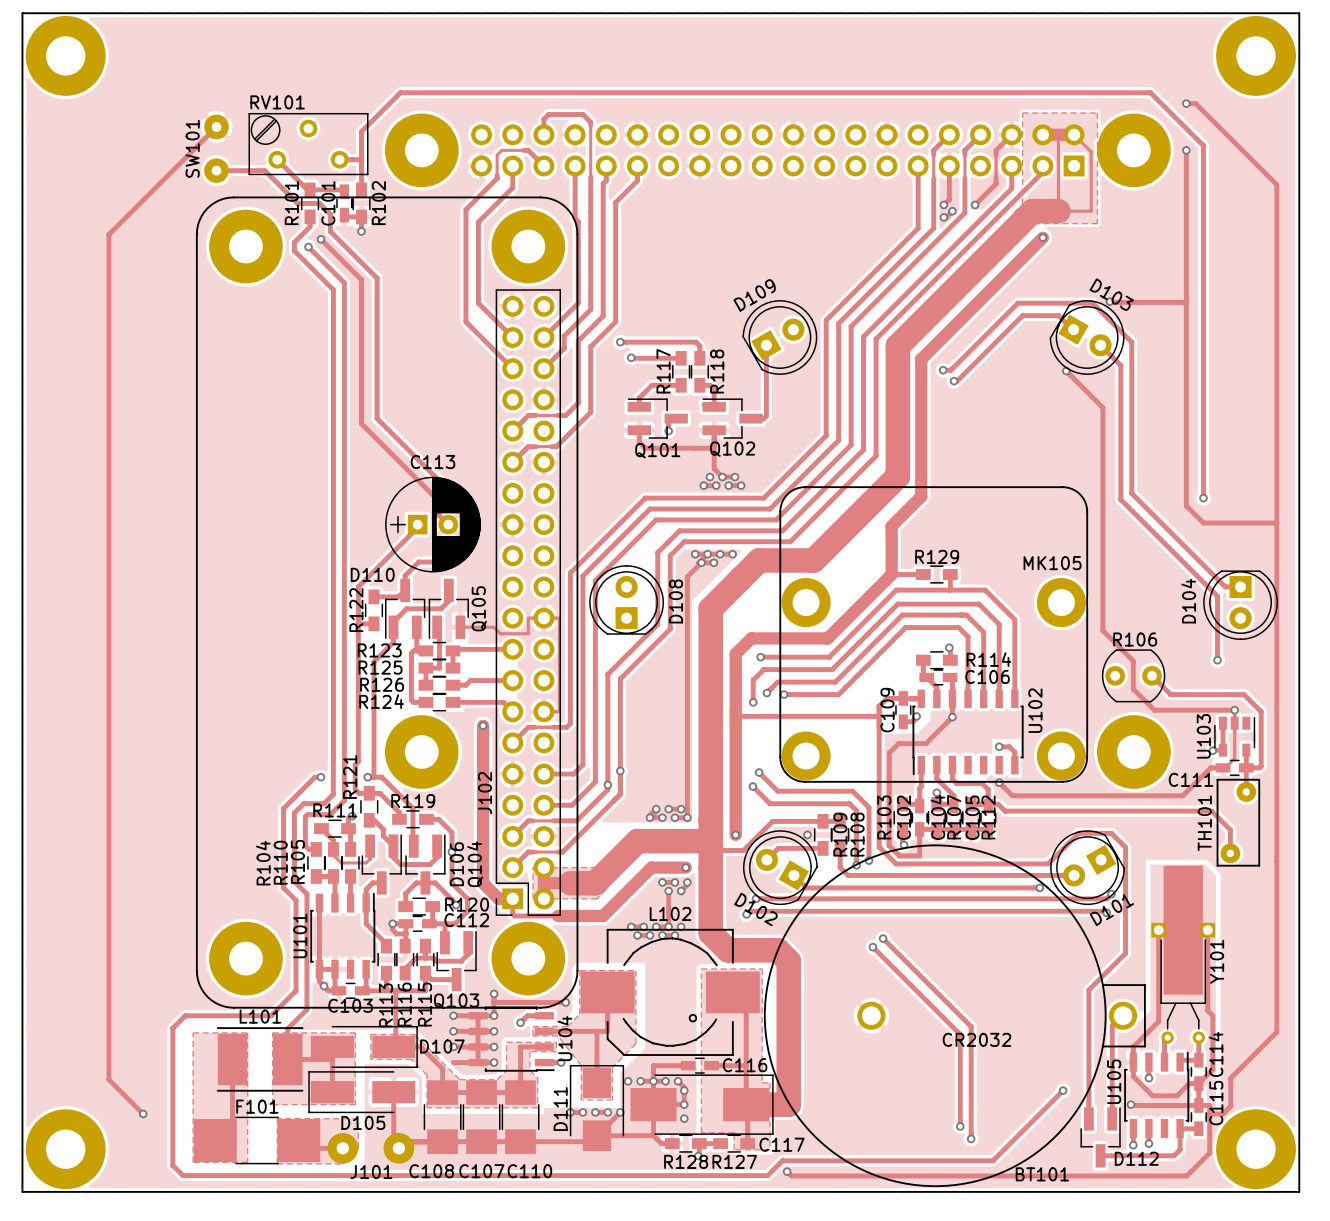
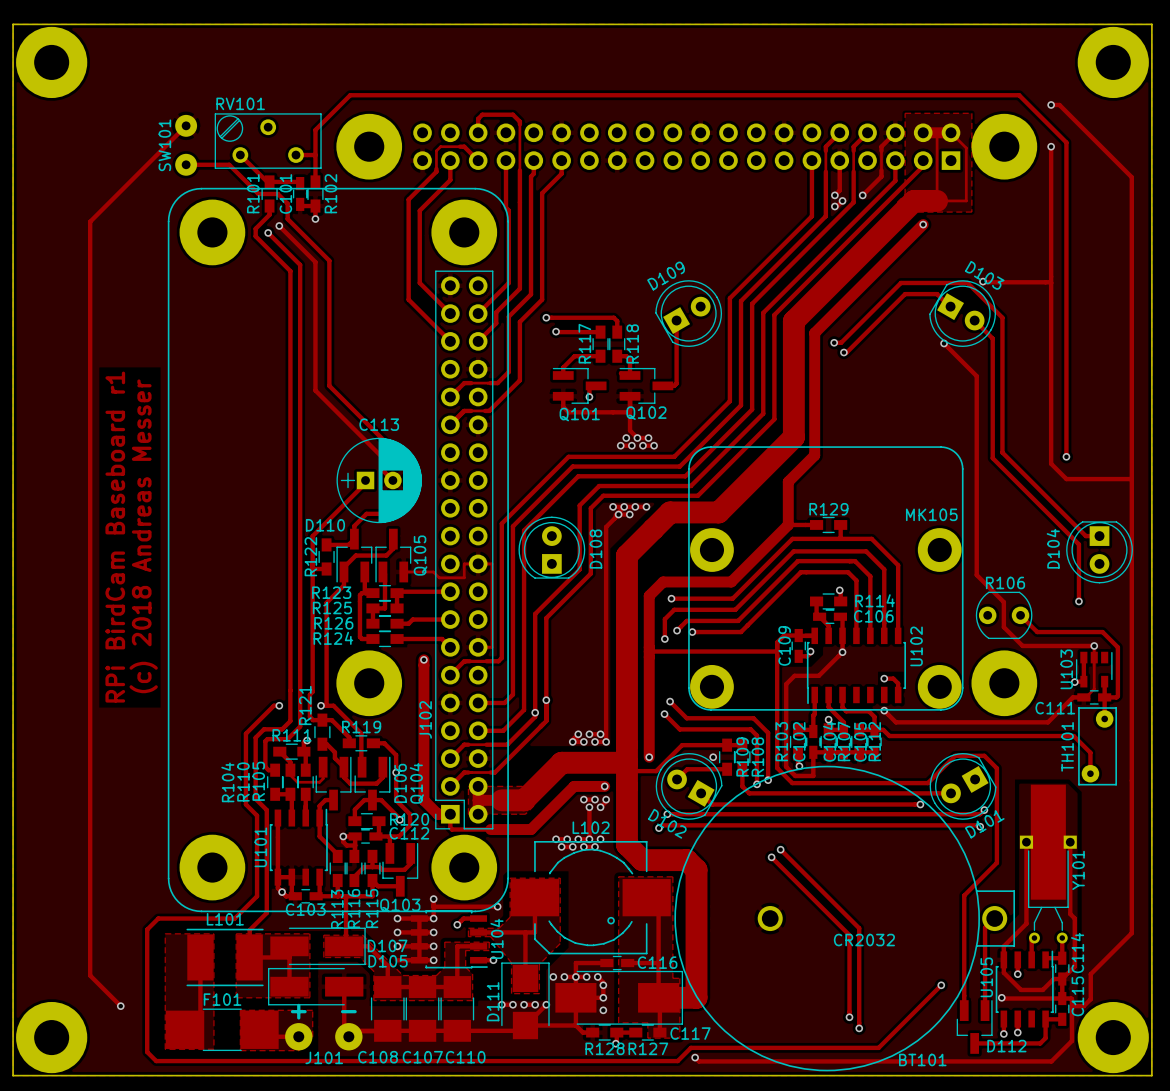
text: none -> (c) 2018 Andreas Messer (143, 536)
text: none -> RPi BirdCam Baseboard r1 (115, 537)
text: none -> + (298, 1011)
text: none -> - (348, 1011)
D105 name position: D105 (363, 1122) -> D105 (388, 961)

